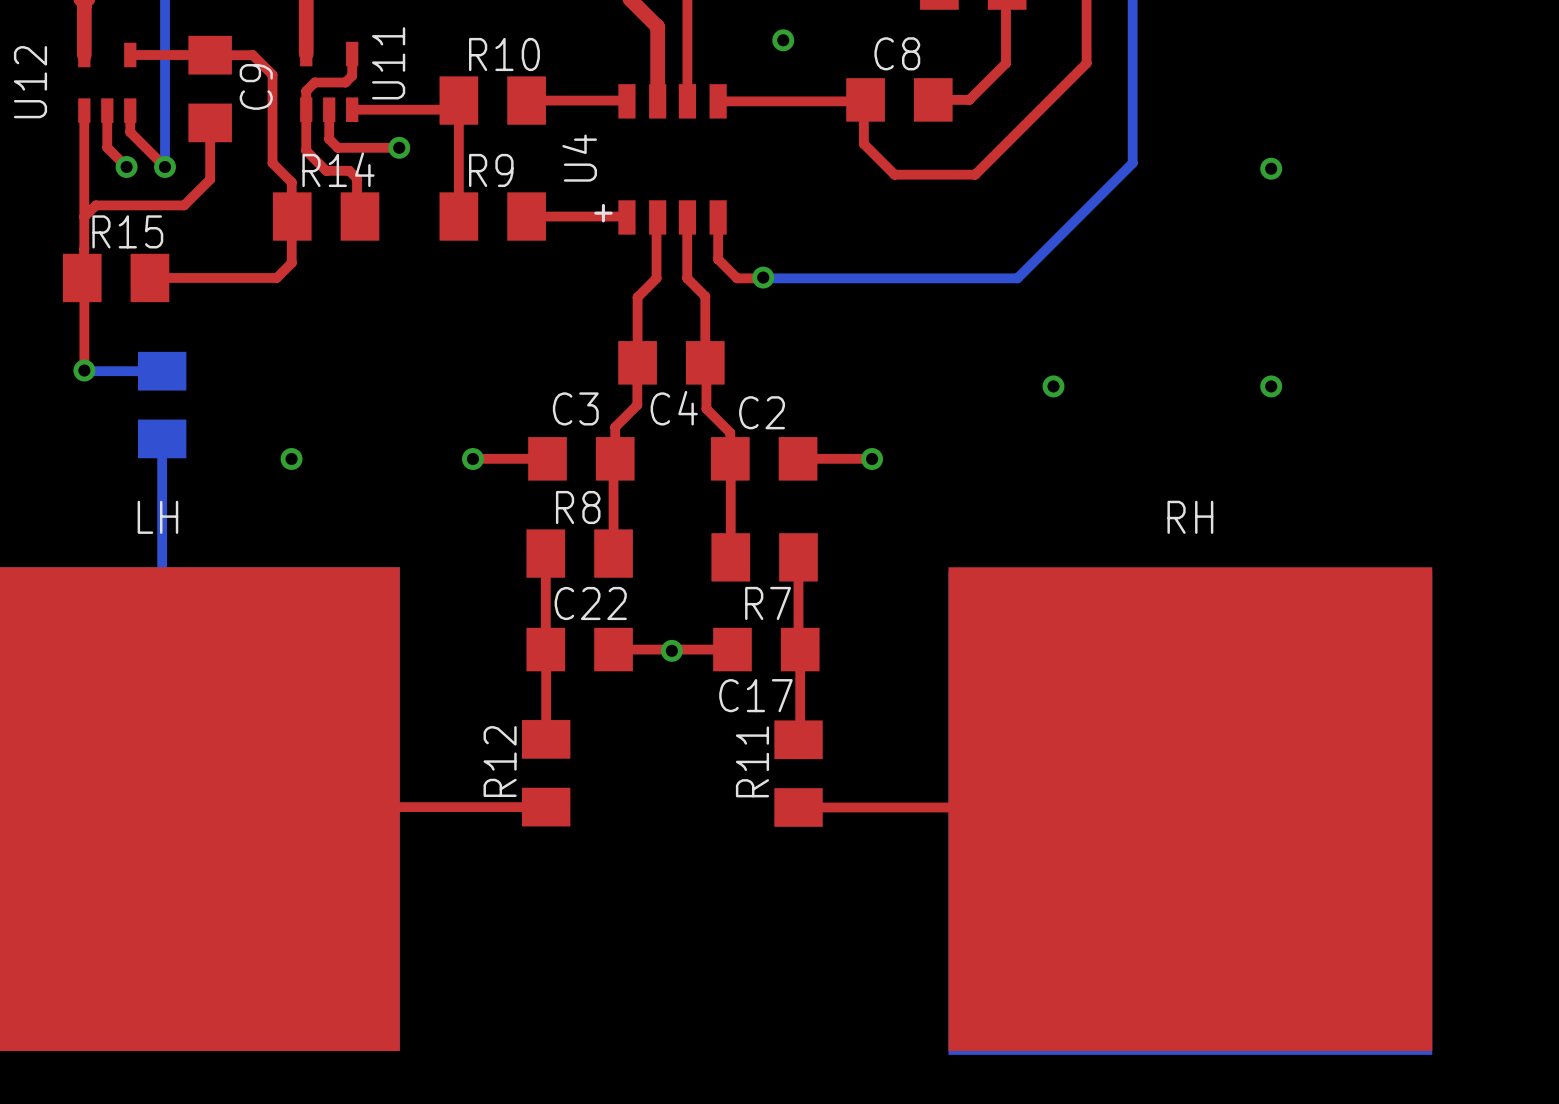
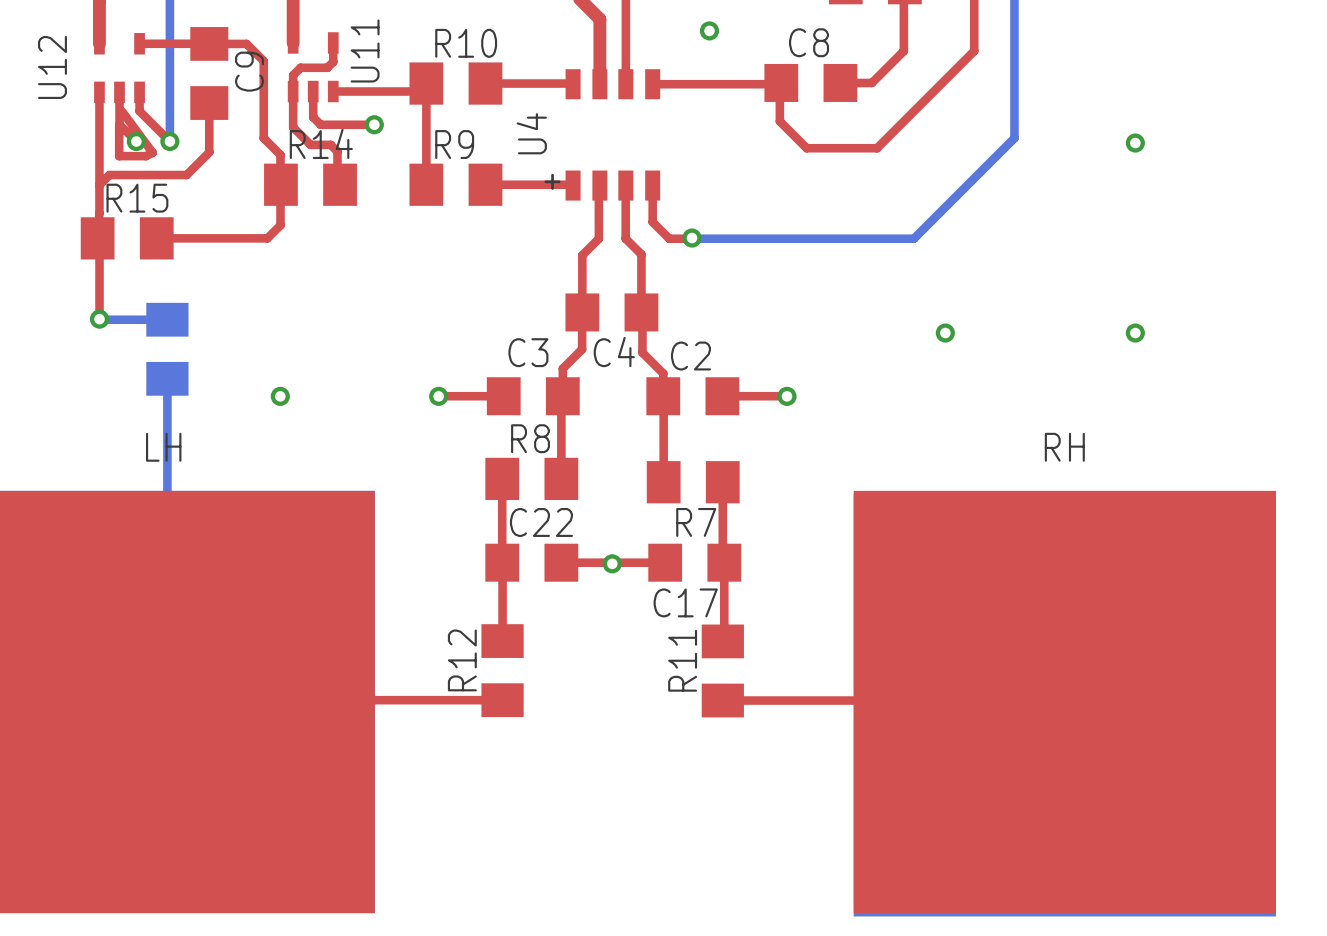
top track: none -> (121, 111) (152, 152) (146, 156) (119, 156) (119, 125)

